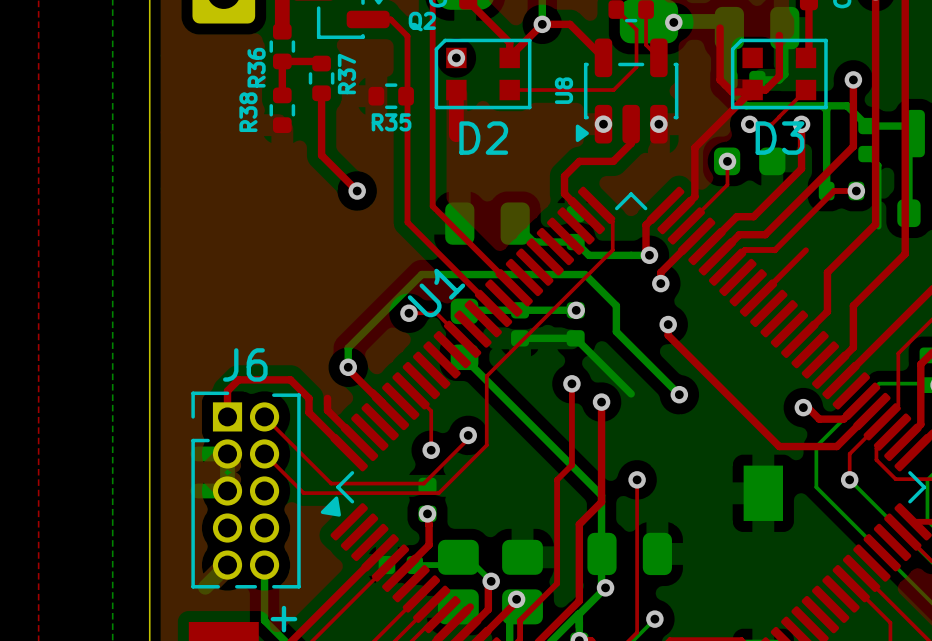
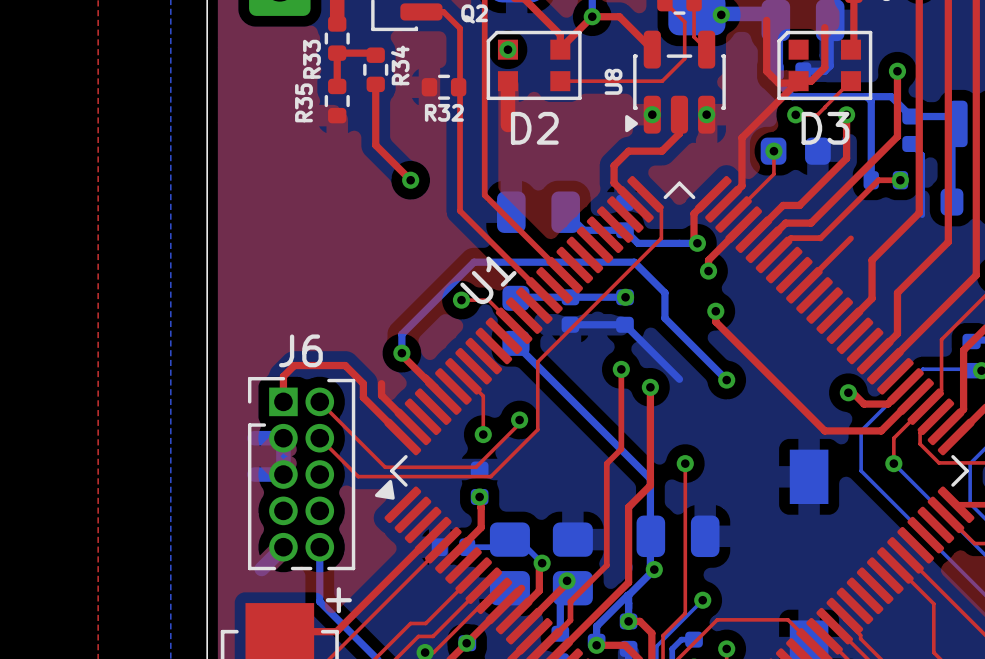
R36 name: R36 (256, 67) -> R33 (311, 59)
R37 name: R37 (346, 74) -> R34 (400, 65)
R38 name: R38 (248, 112) -> R35 (303, 102)
R35 name: R35 (391, 122) -> R32 (444, 112)

